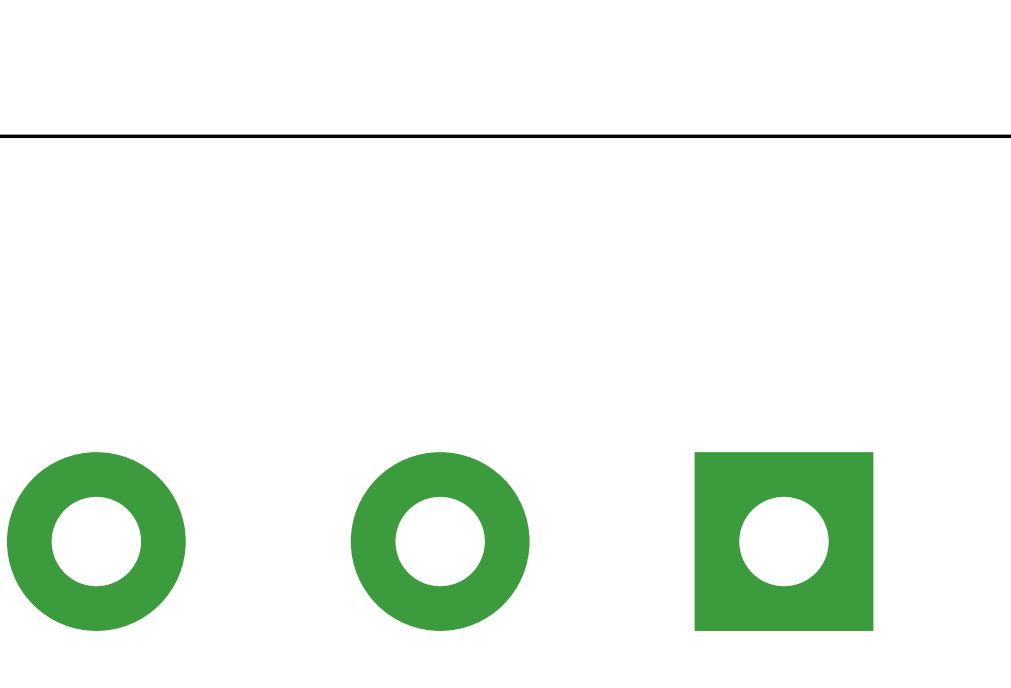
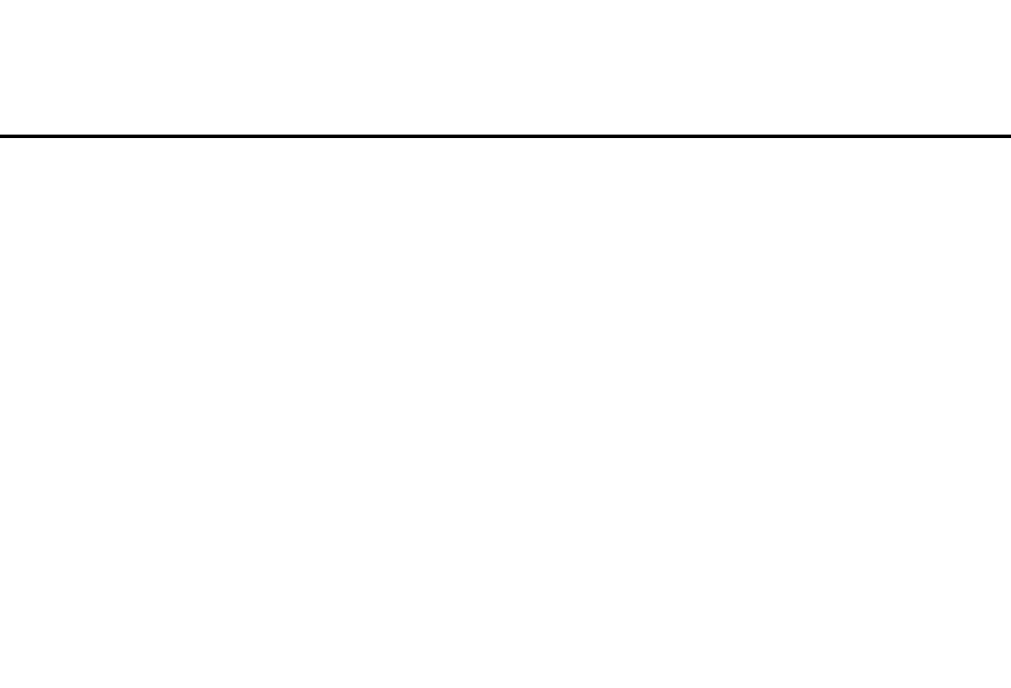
part: (440, 541) -> none

